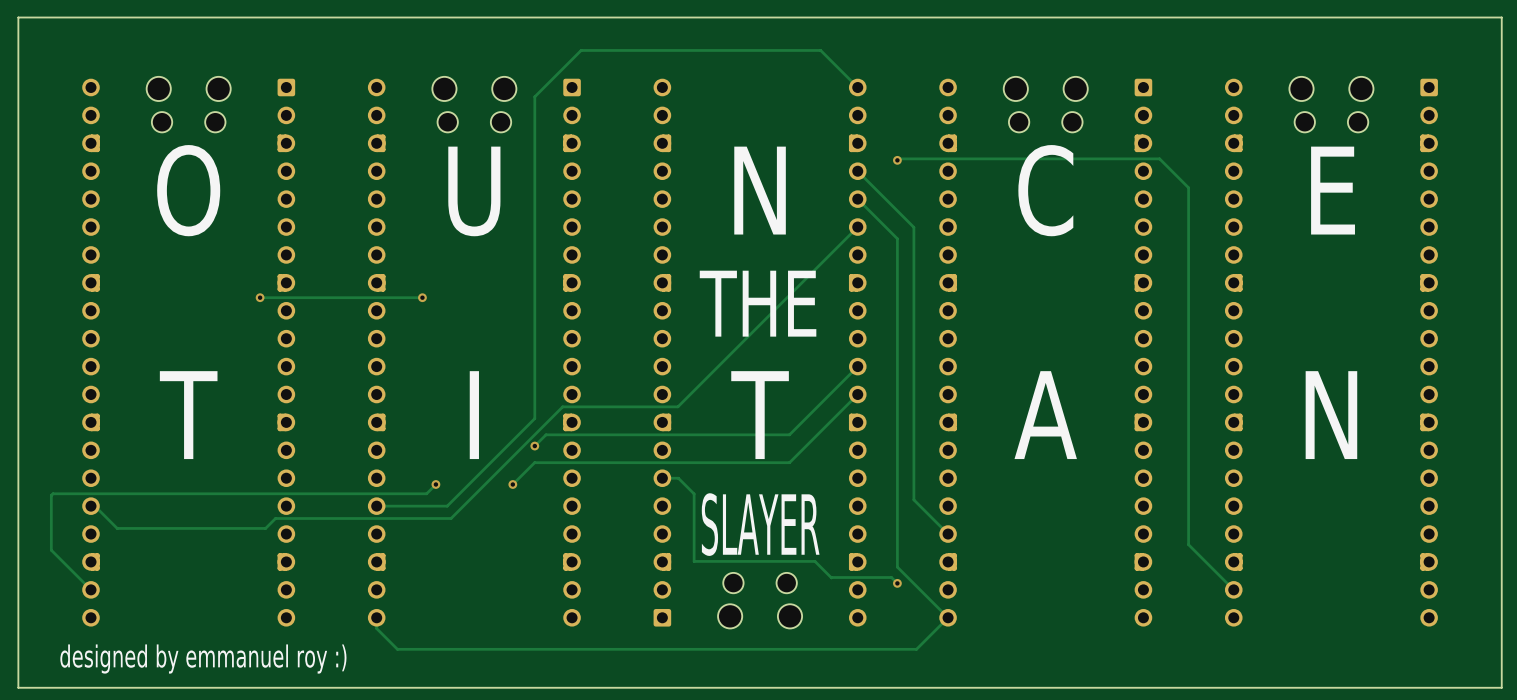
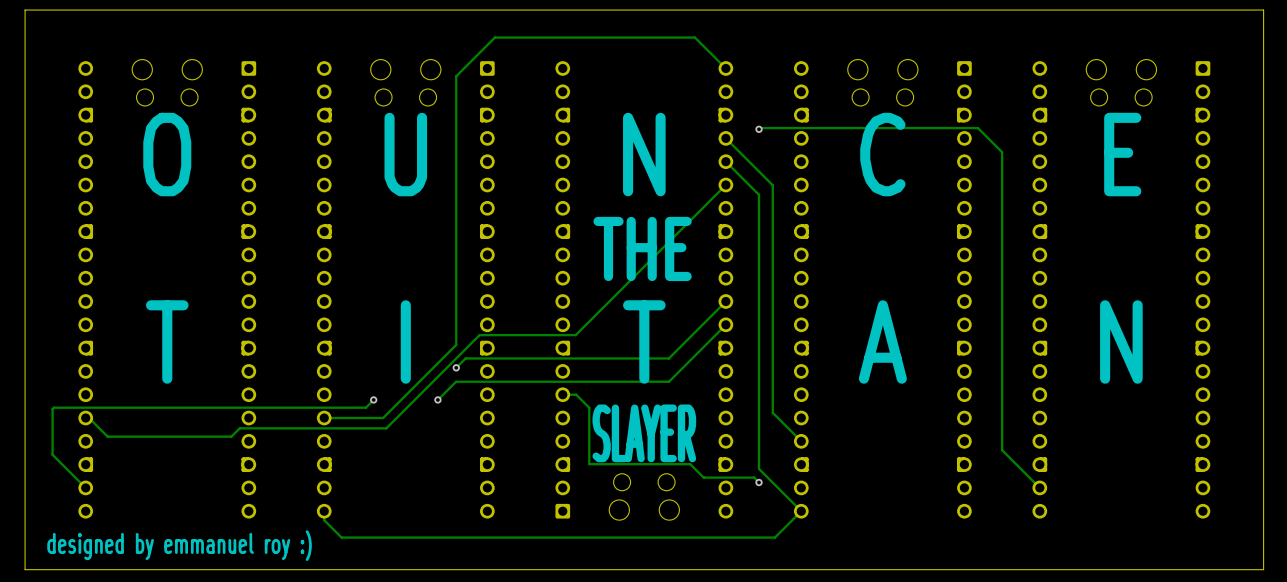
via: (260, 297) -> none
track: (422, 297) (260, 297) -> none
via: (422, 297) -> none

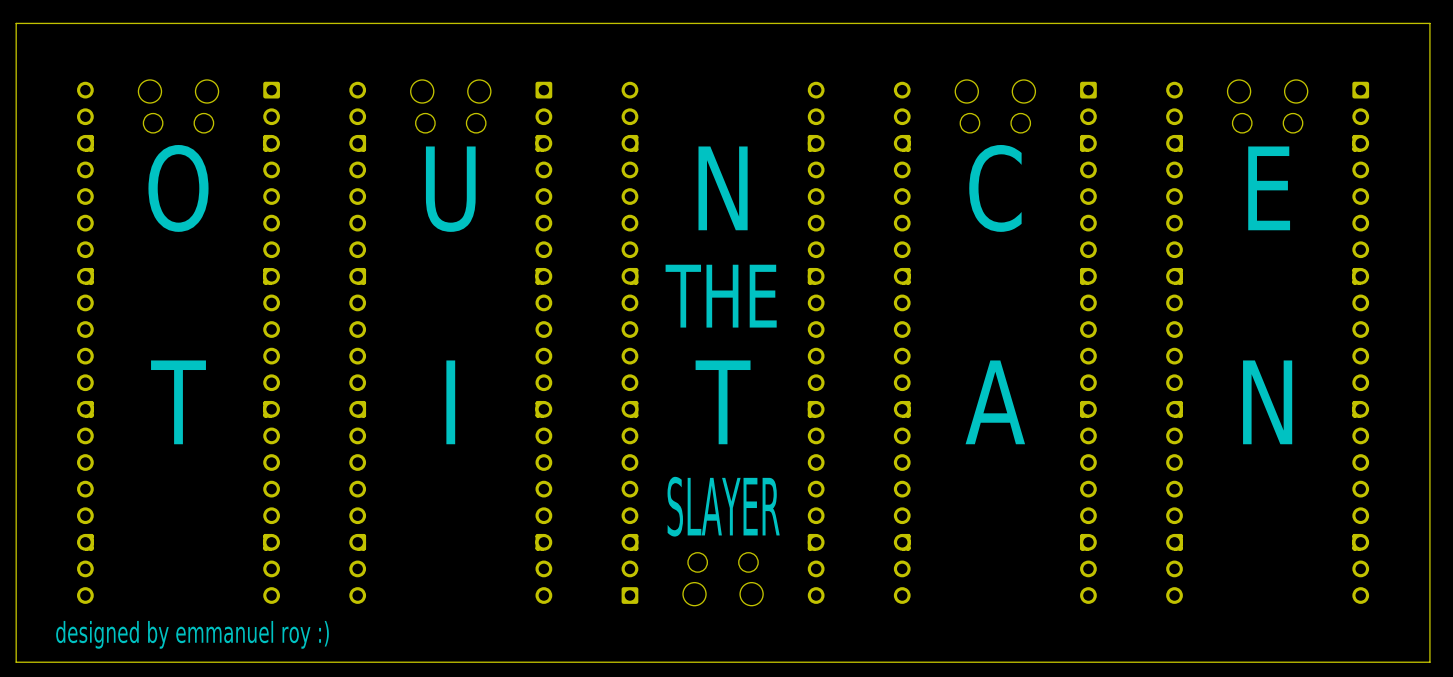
track: (725, 68) (694, 37) (494, 37) (456, 76) (456, 344) (383, 418) (324, 418) -> none
track: (759, 129) (977, 128) (1002, 152) (1002, 450) (1039, 487) -> none
via: (759, 129) -> none
track: (725, 138) (772, 185) (772, 412) (801, 441) -> none
track: (725, 161) (759, 194) (759, 468) (801, 511) (774, 537) (341, 537) (324, 520) (324, 511) -> none
track: (725, 184) (575, 335) (479, 335) (386, 428) (239, 428) (231, 436) (107, 436) (89, 418) (85, 418) -> none
track: (725, 301) (668, 358) (465, 358) (456, 367) -> none
track: (725, 324) (668, 381) (456, 381) (437, 399) -> none
via: (456, 367) -> none
track: (562, 394) (576, 394) (589, 407) (589, 464) (690, 464) (703, 477) (754, 477) (759, 482) -> none
track: (373, 399) (365, 407) (54, 407) (52, 454) (85, 487) -> none
via: (373, 399) -> none
via: (437, 399) -> none
via: (759, 482) -> none

